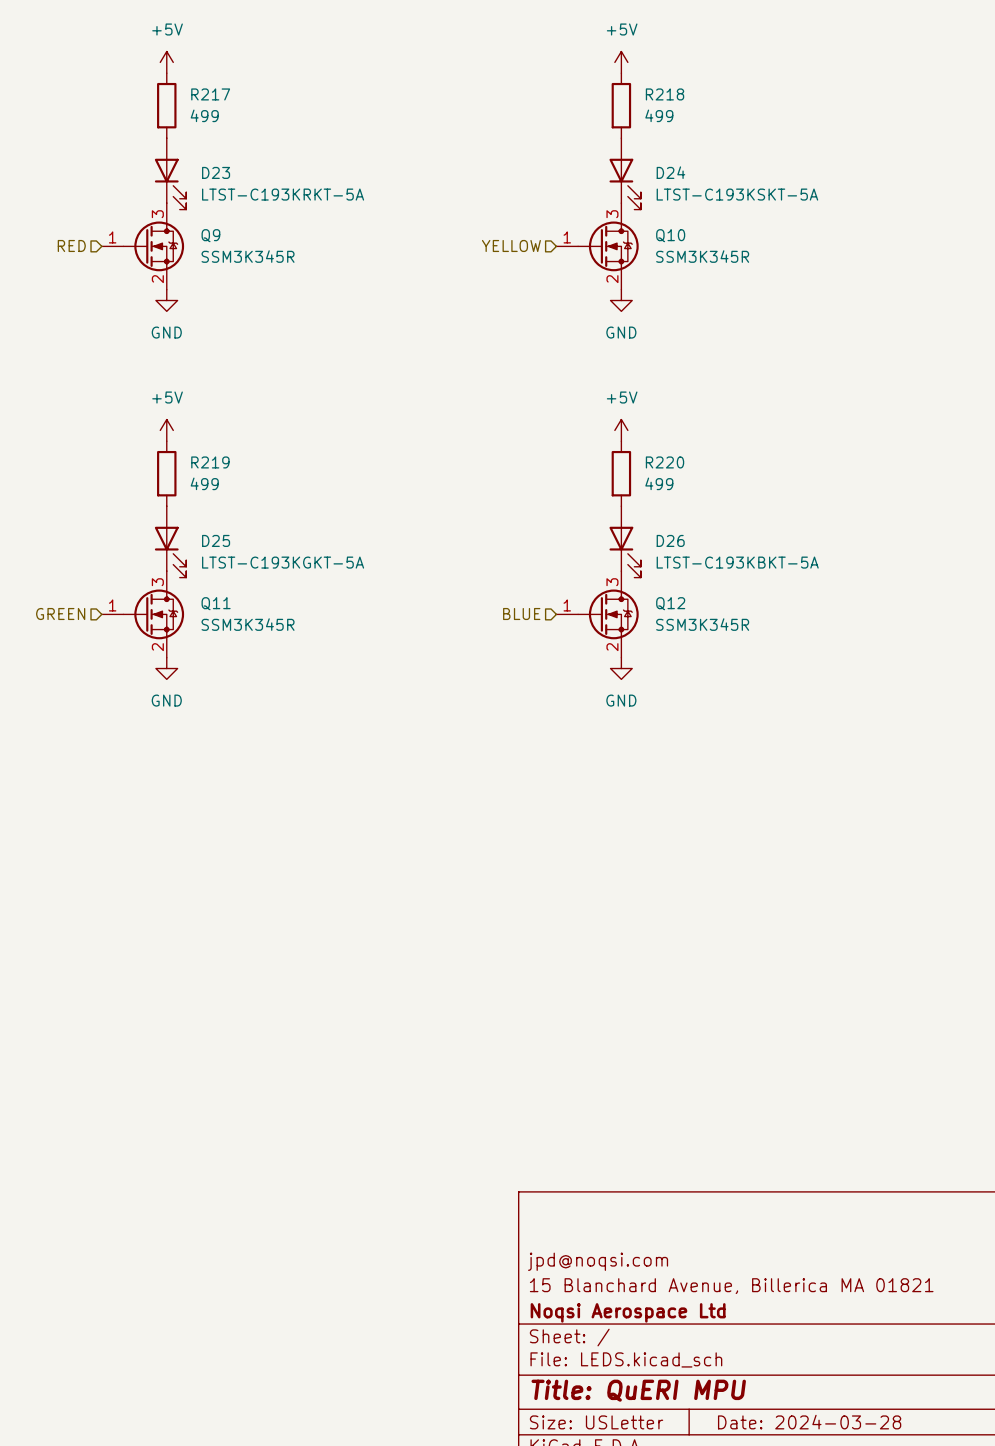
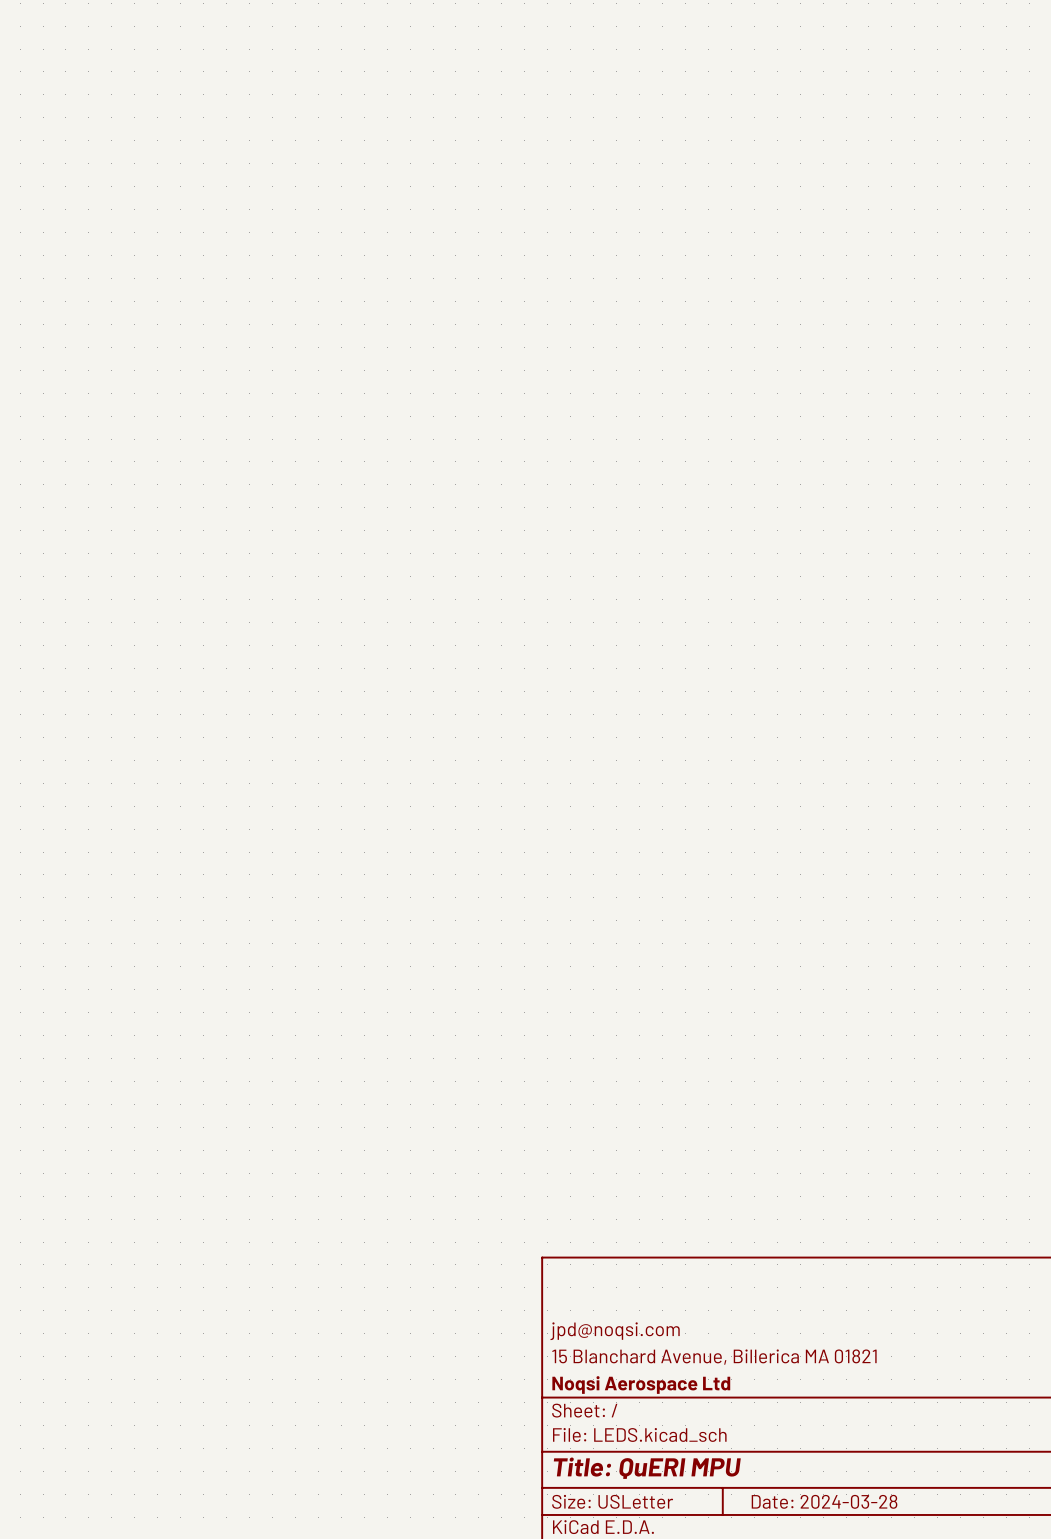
power symbol: +5V (166, 62) -> none
power symbol: +5V (621, 62) -> none
R217: 499 (166, 105) -> none
R218: 499 (621, 105) -> none
D23: LTST-C193KRKT-5A (170, 173) -> none
D24: LTST-C193KSKT-5A (625, 173) -> none
hierarchical label: RED (71, 245) -> none
hierarchical label: YELLOW (511, 245) -> none
Q9: SSM3K345R (142, 246) -> none
Q10: SSM3K345R (597, 246) -> none
power symbol: GND (166, 300) -> none
power symbol: GND (621, 300) -> none
power symbol: +5V (166, 430) -> none
power symbol: +5V (621, 430) -> none
R219: 499 (166, 473) -> none
R220: 499 (621, 473) -> none
D25: LTST-C193KGKT-5A (170, 541) -> none
D26: LTST-C193KBKT-5A (625, 541) -> none
hierarchical label: GREEN (60, 614) -> none
Q11: SSM3K345R (142, 614) -> none
hierarchical label: BLUE (521, 614) -> none
Q12: SSM3K345R (597, 614) -> none
power symbol: GND (166, 668) -> none
power symbol: GND (621, 668) -> none

